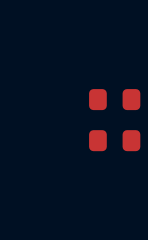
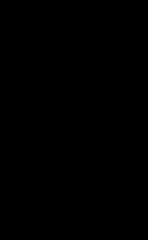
part: (114, 99) -> none
part: (114, 140) -> none

